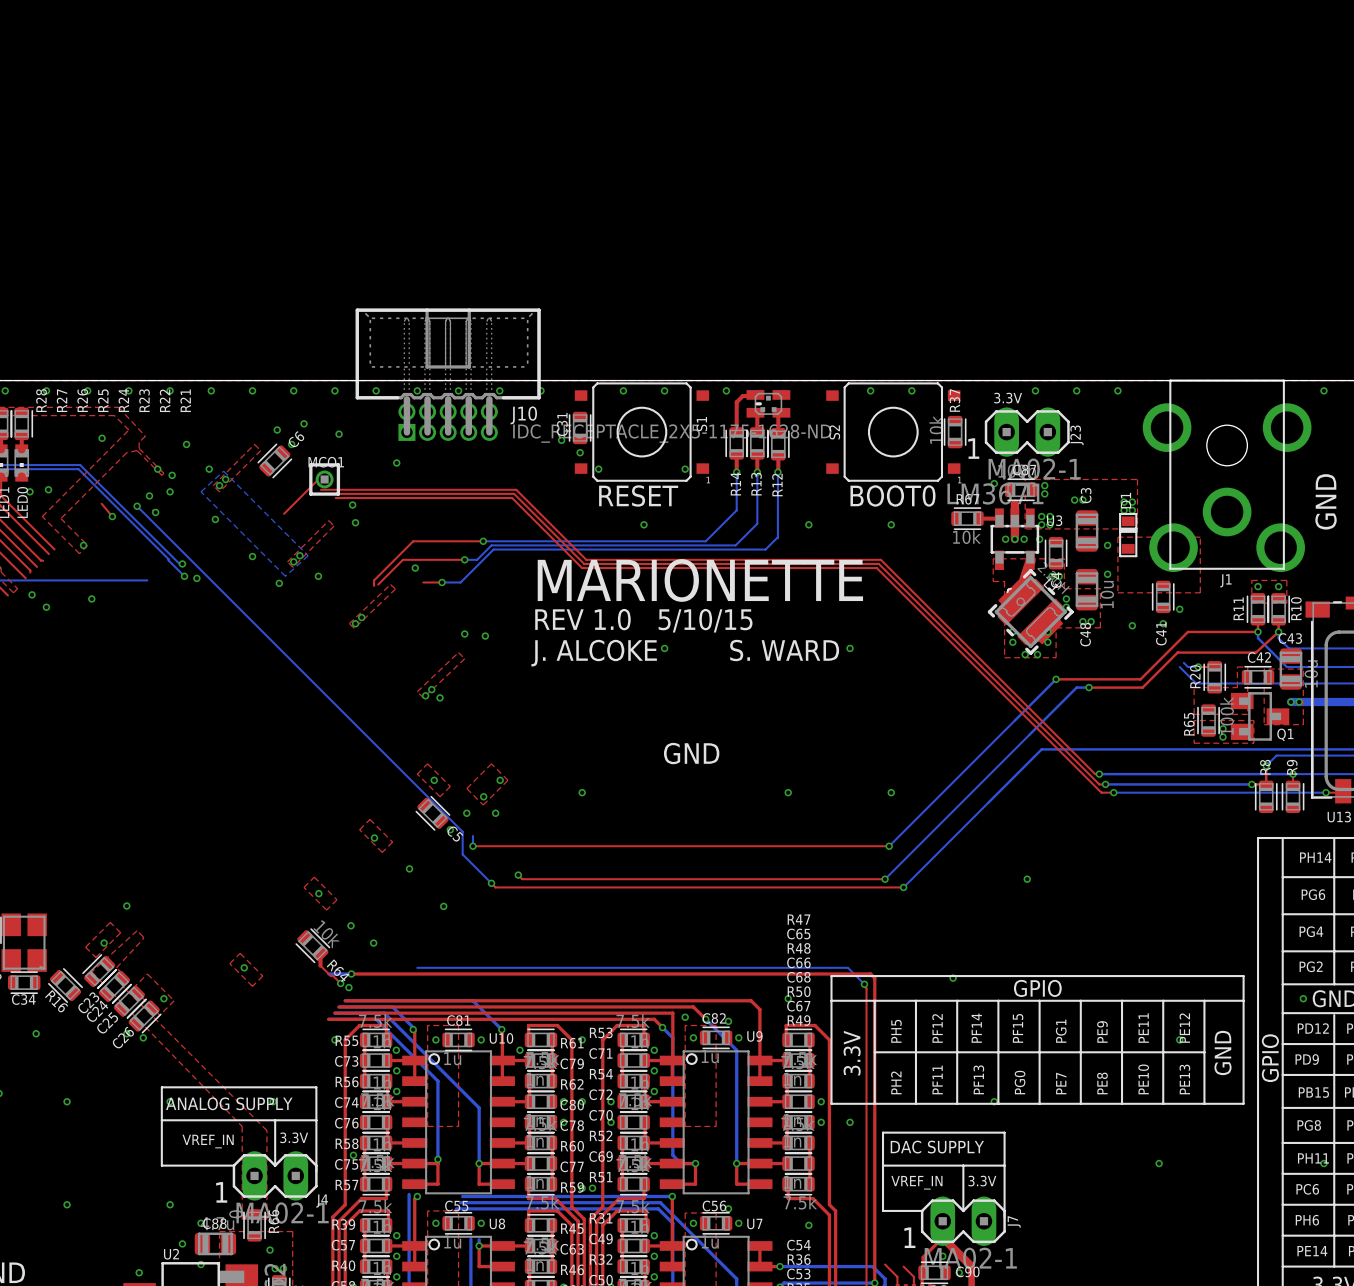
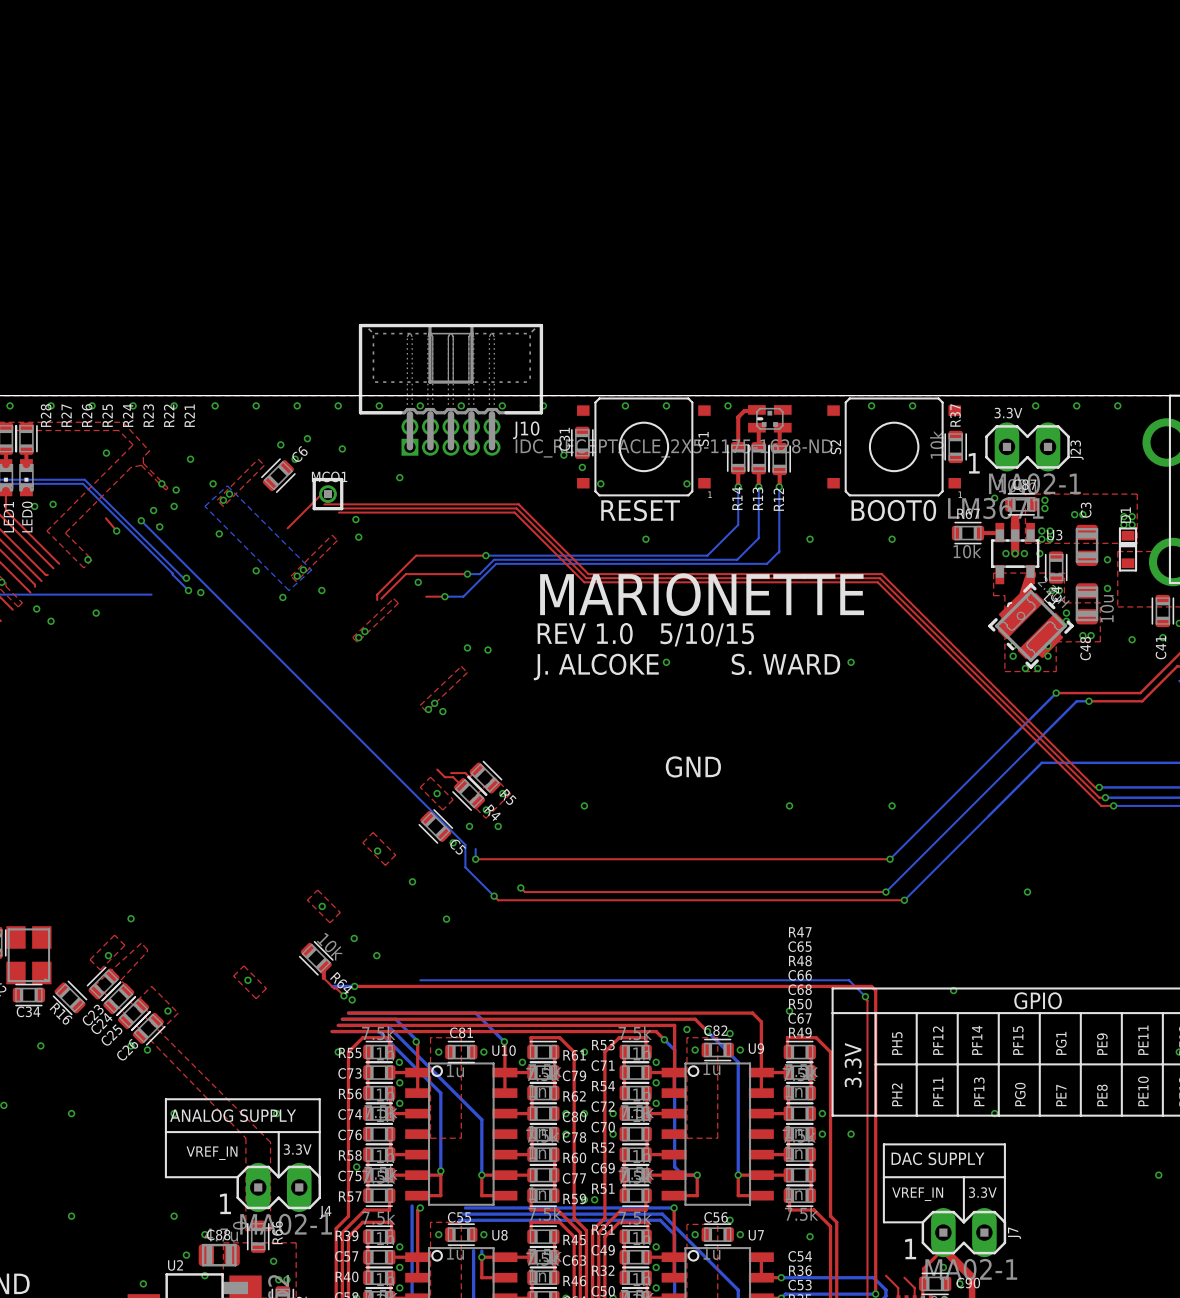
top track: none -> (478, 767) (469, 777) (465, 773) (451, 773)
top track: none -> (437, 769) (444, 777) (453, 777) (461, 785)
R5: none -> (485, 778)
R4: none -> (469, 793)

